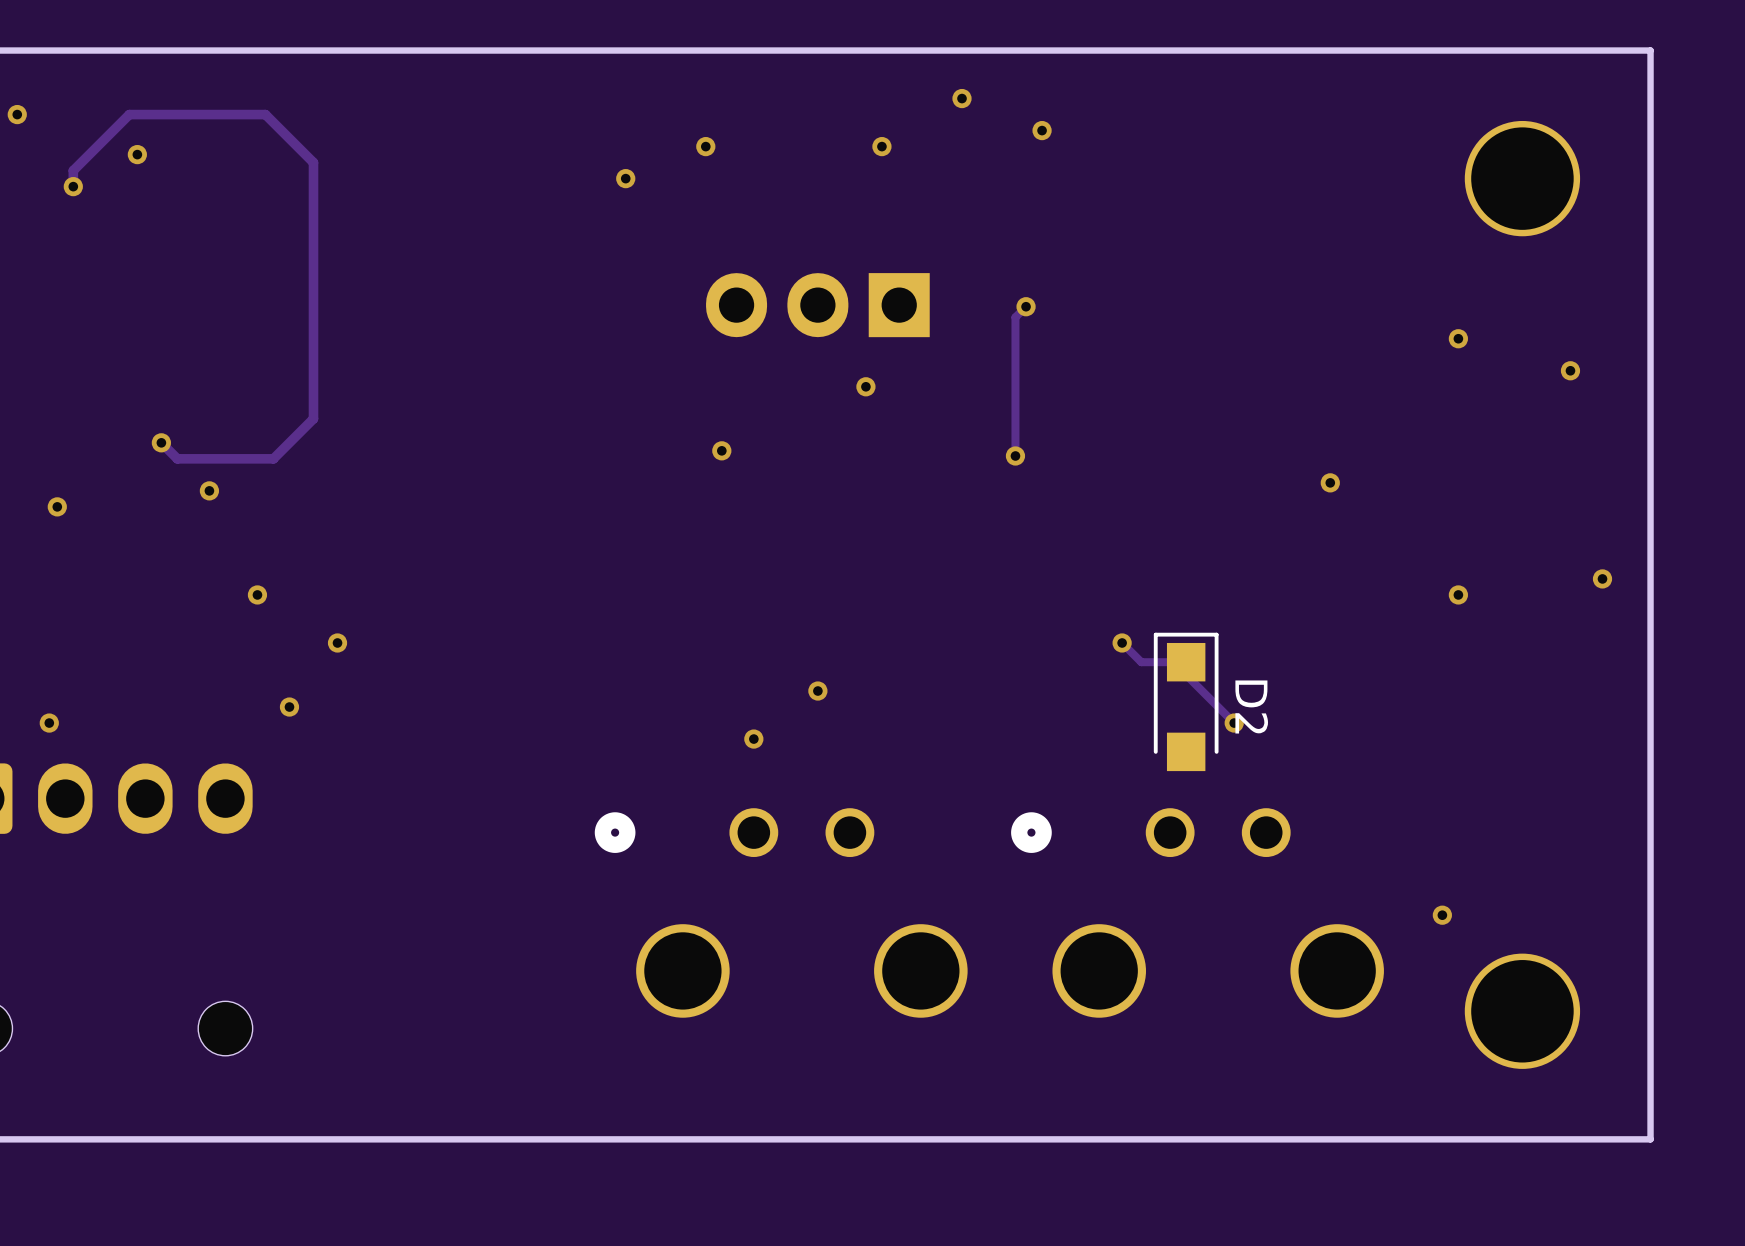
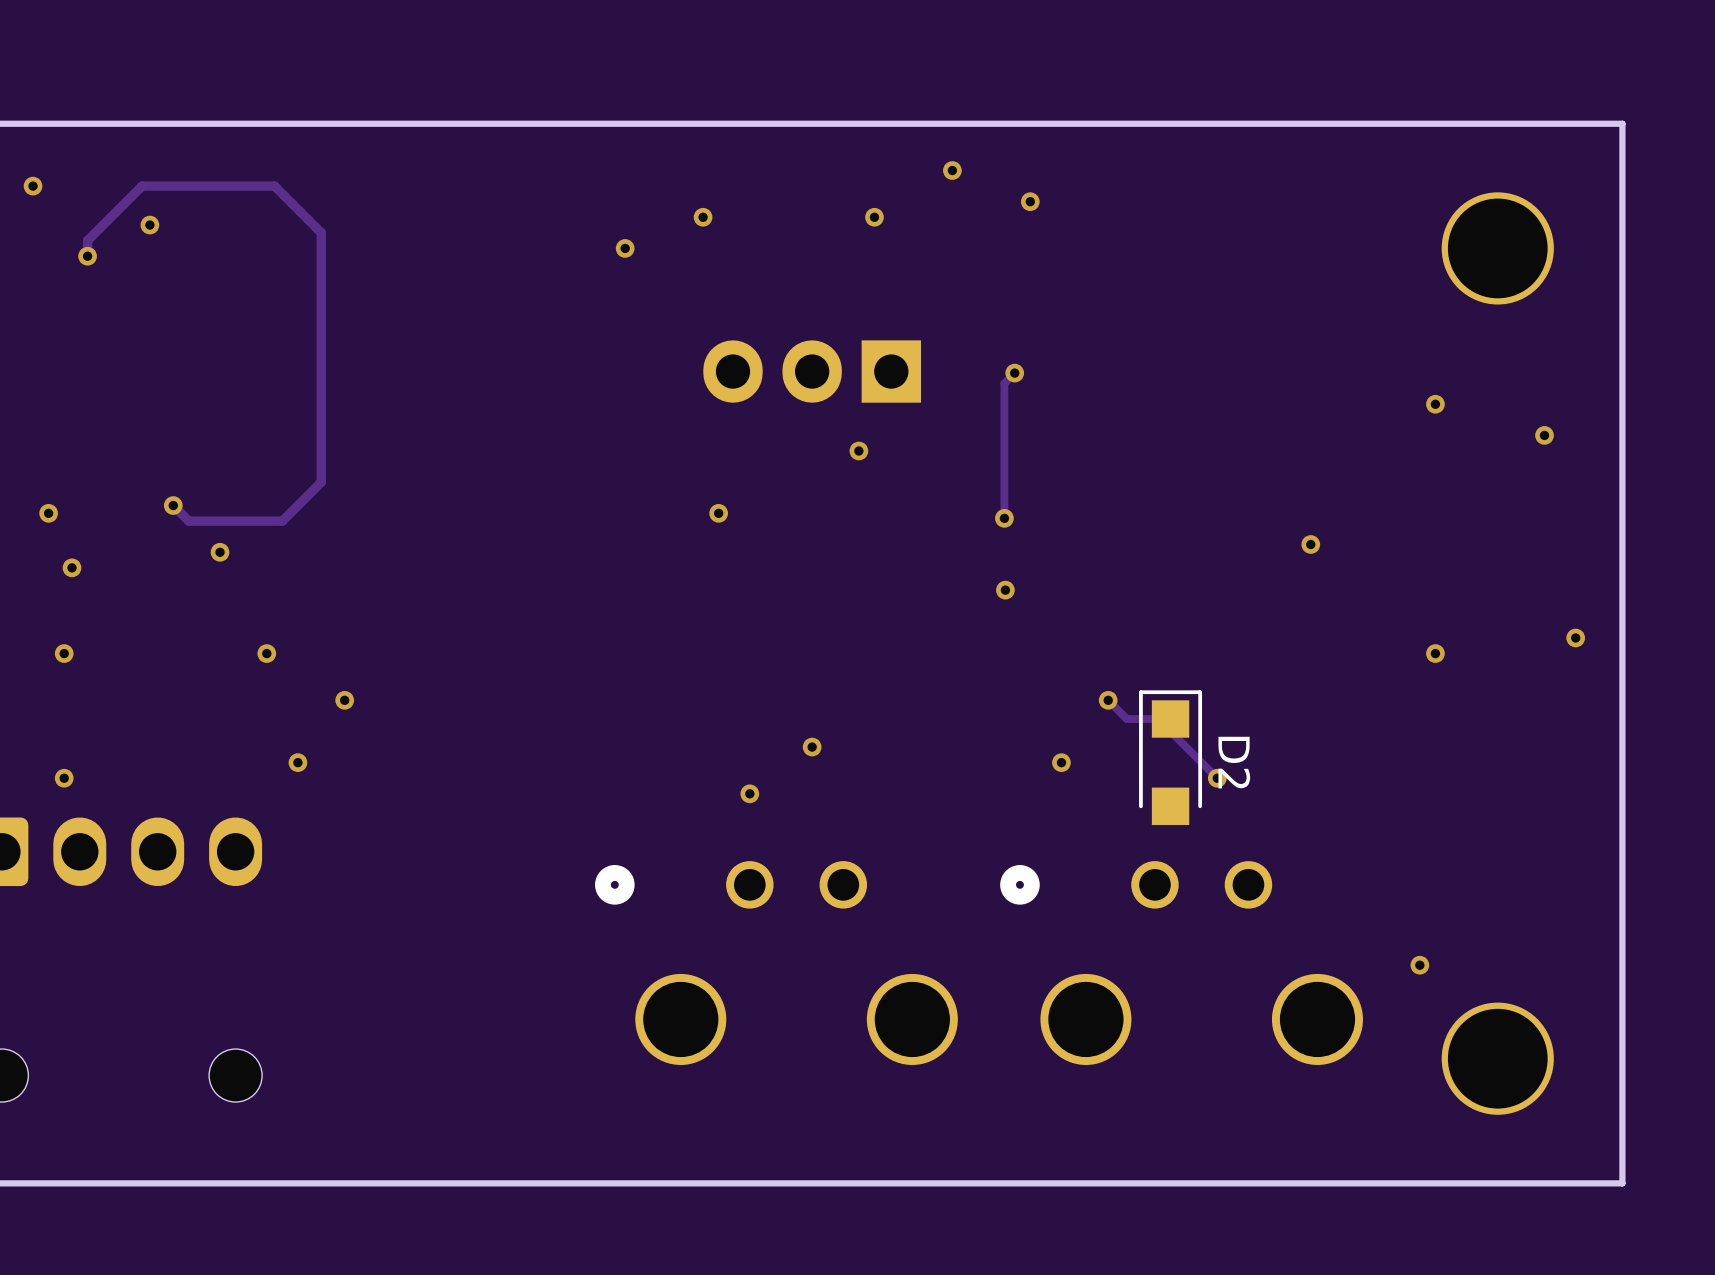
via: none -> (48, 513)
via: none -> (1005, 590)
via: none -> (64, 653)
via: none -> (1061, 762)

